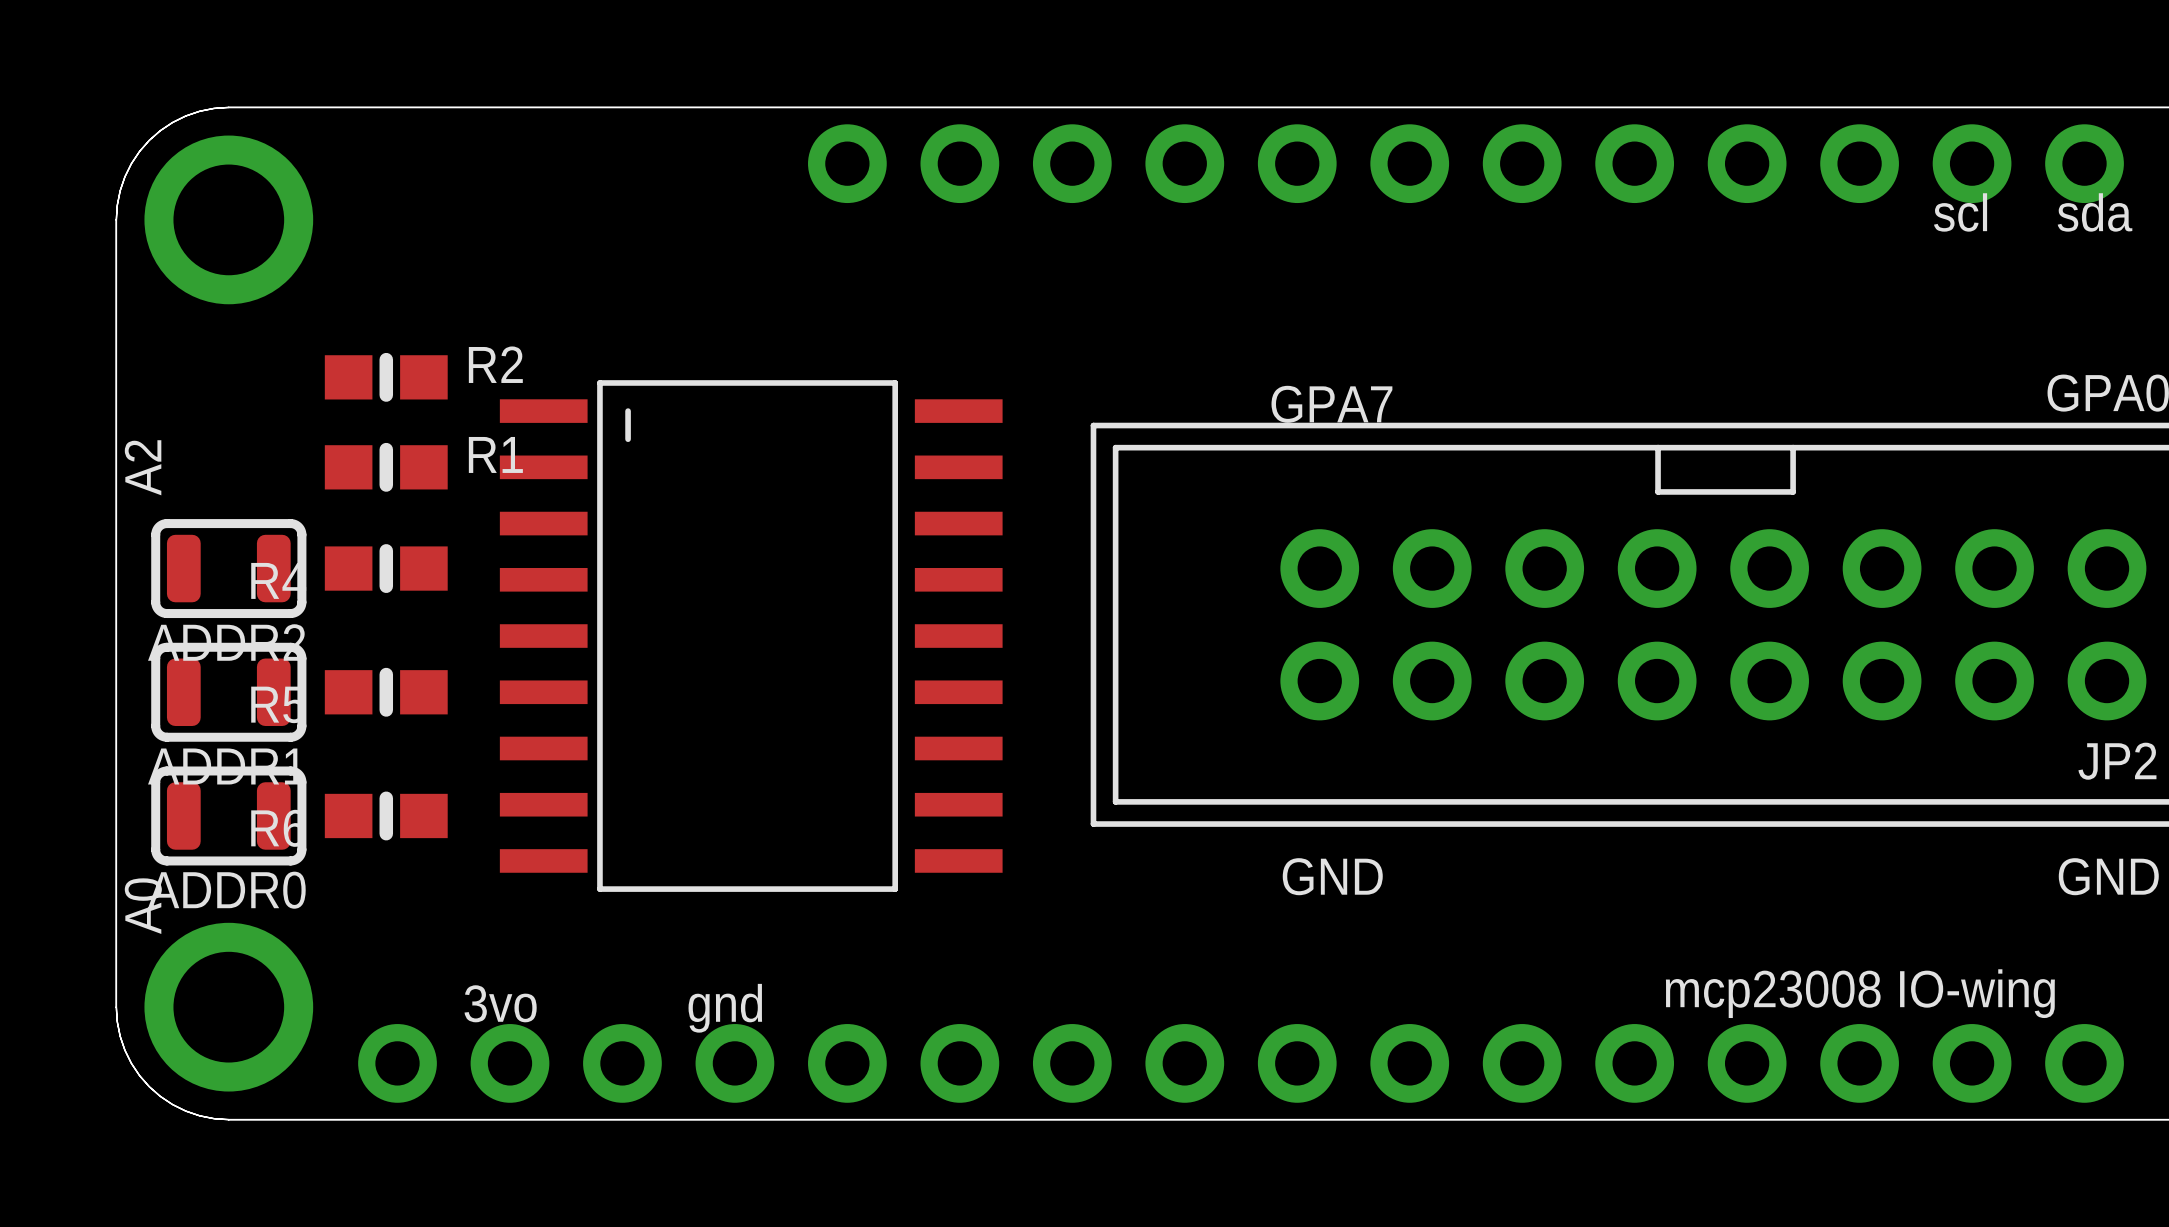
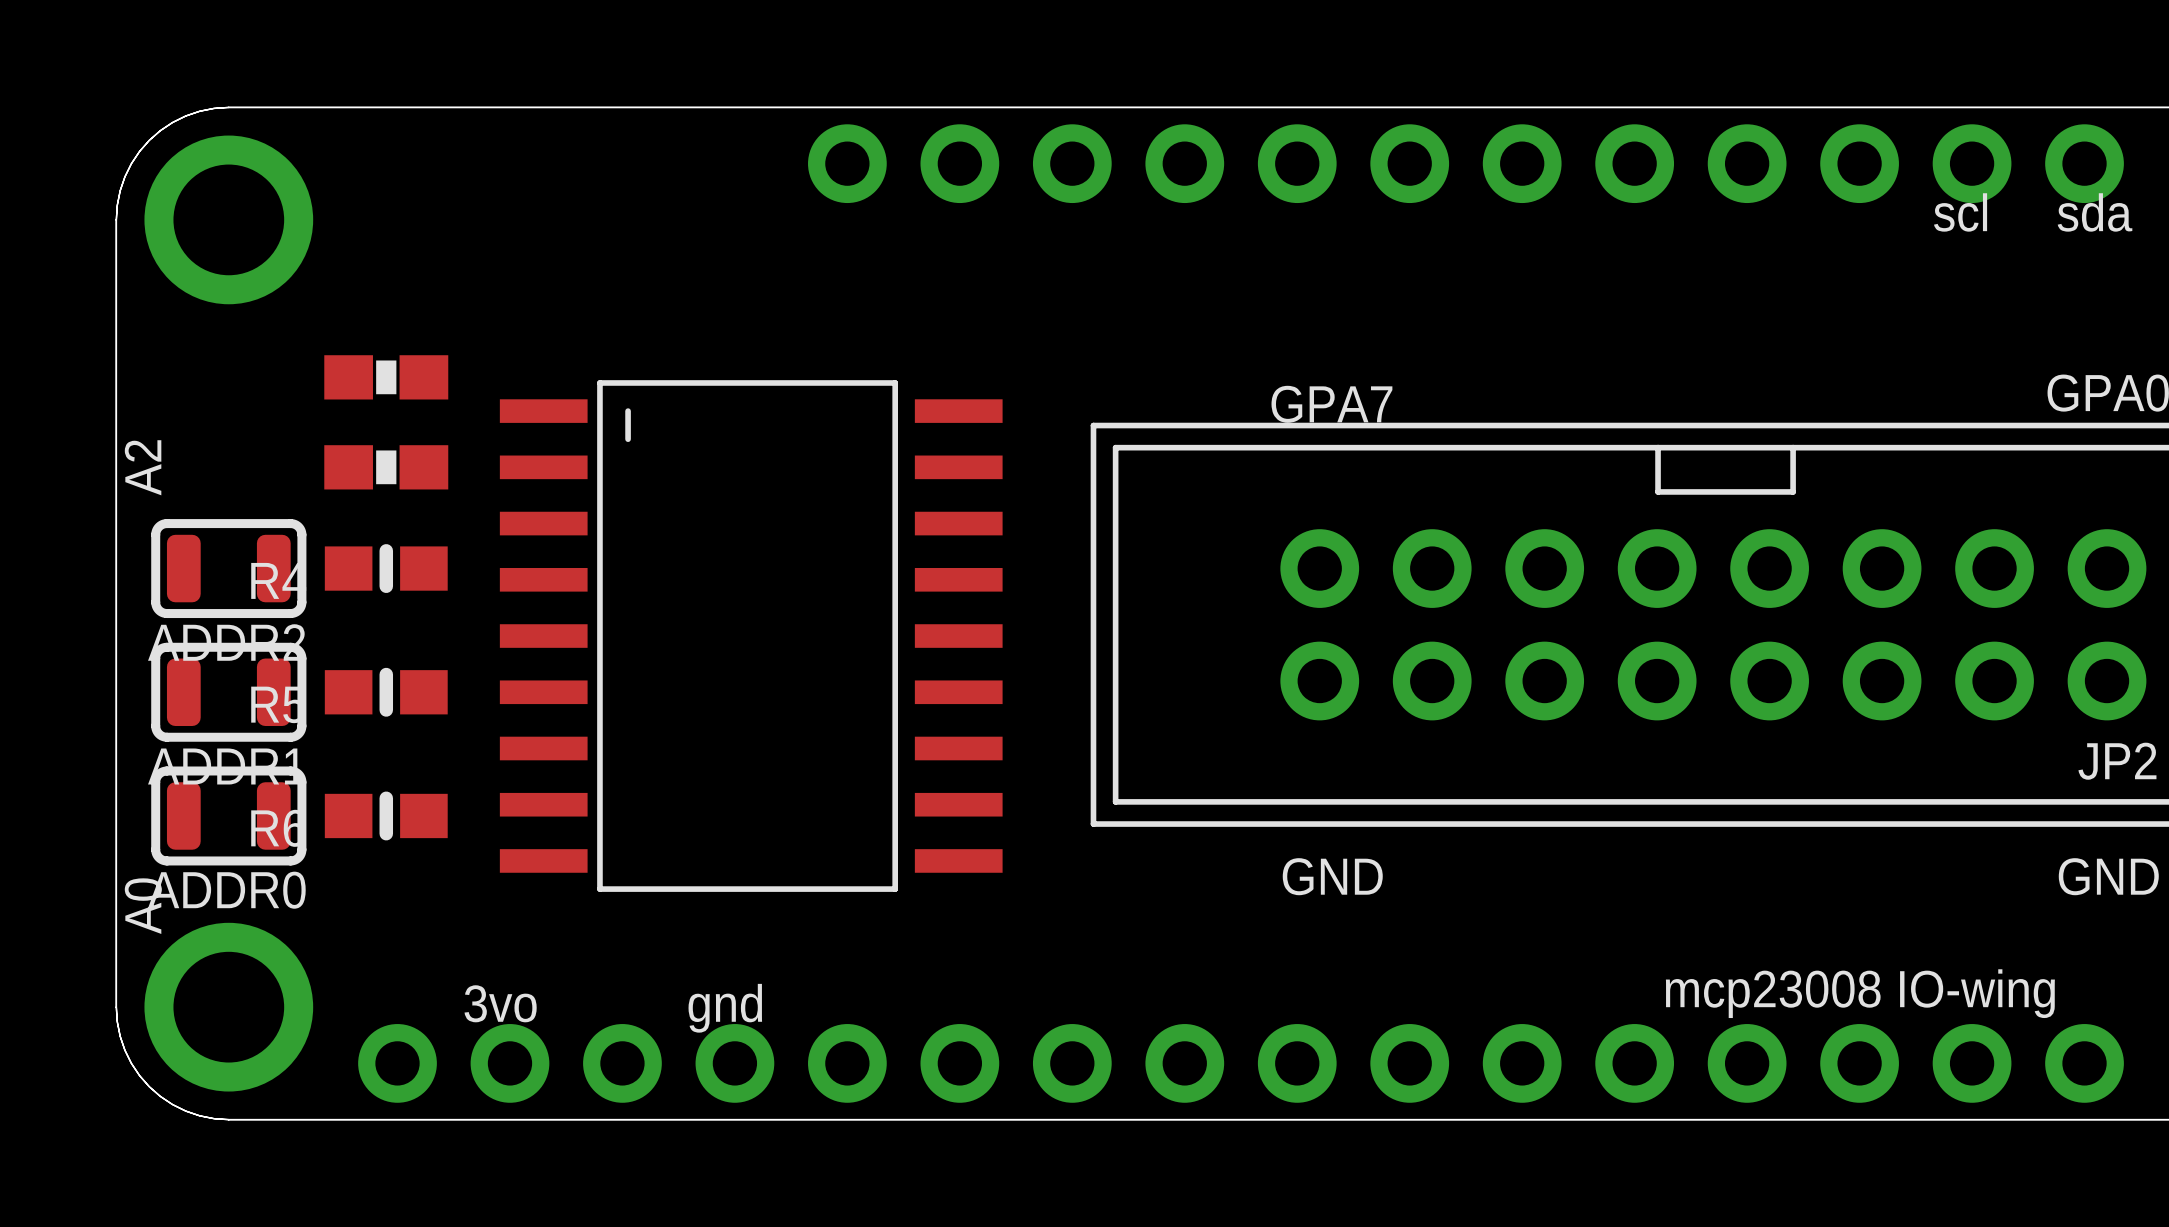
R2: (386, 377) -> none
part: none -> (386, 377)
R1: (386, 467) -> none
part: none -> (386, 467)

